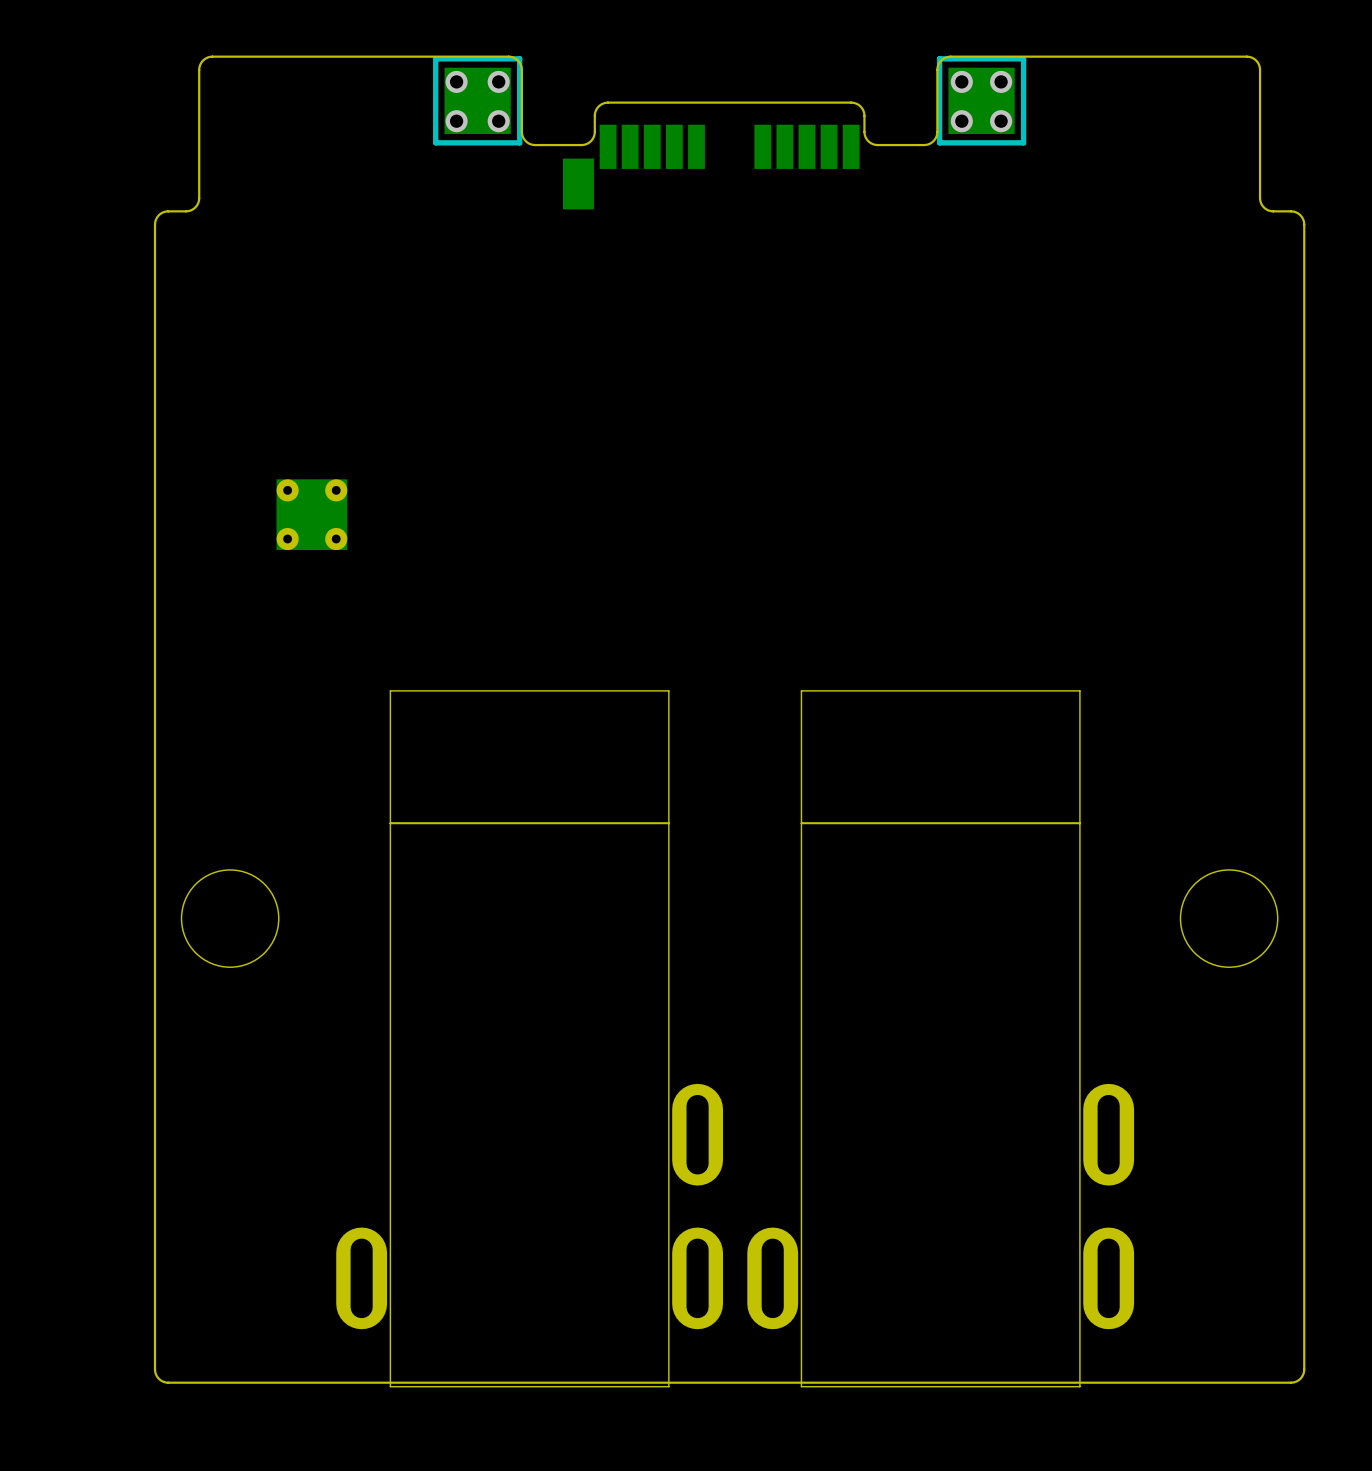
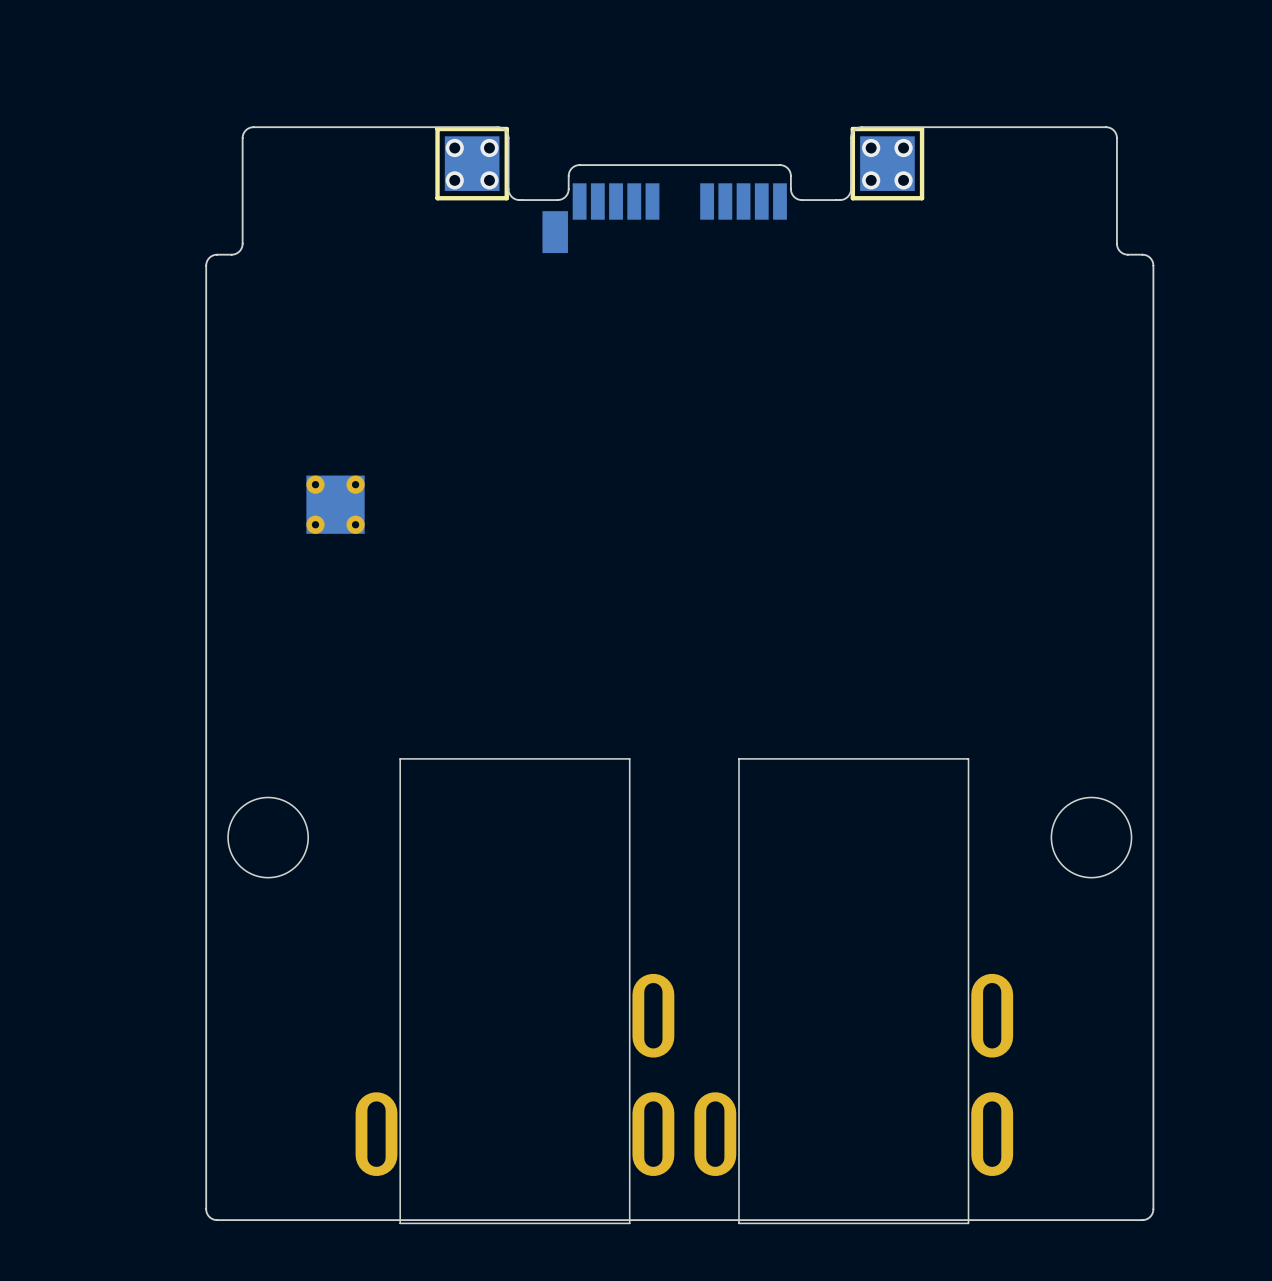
part: (529, 757) -> none
part: (940, 757) -> none

